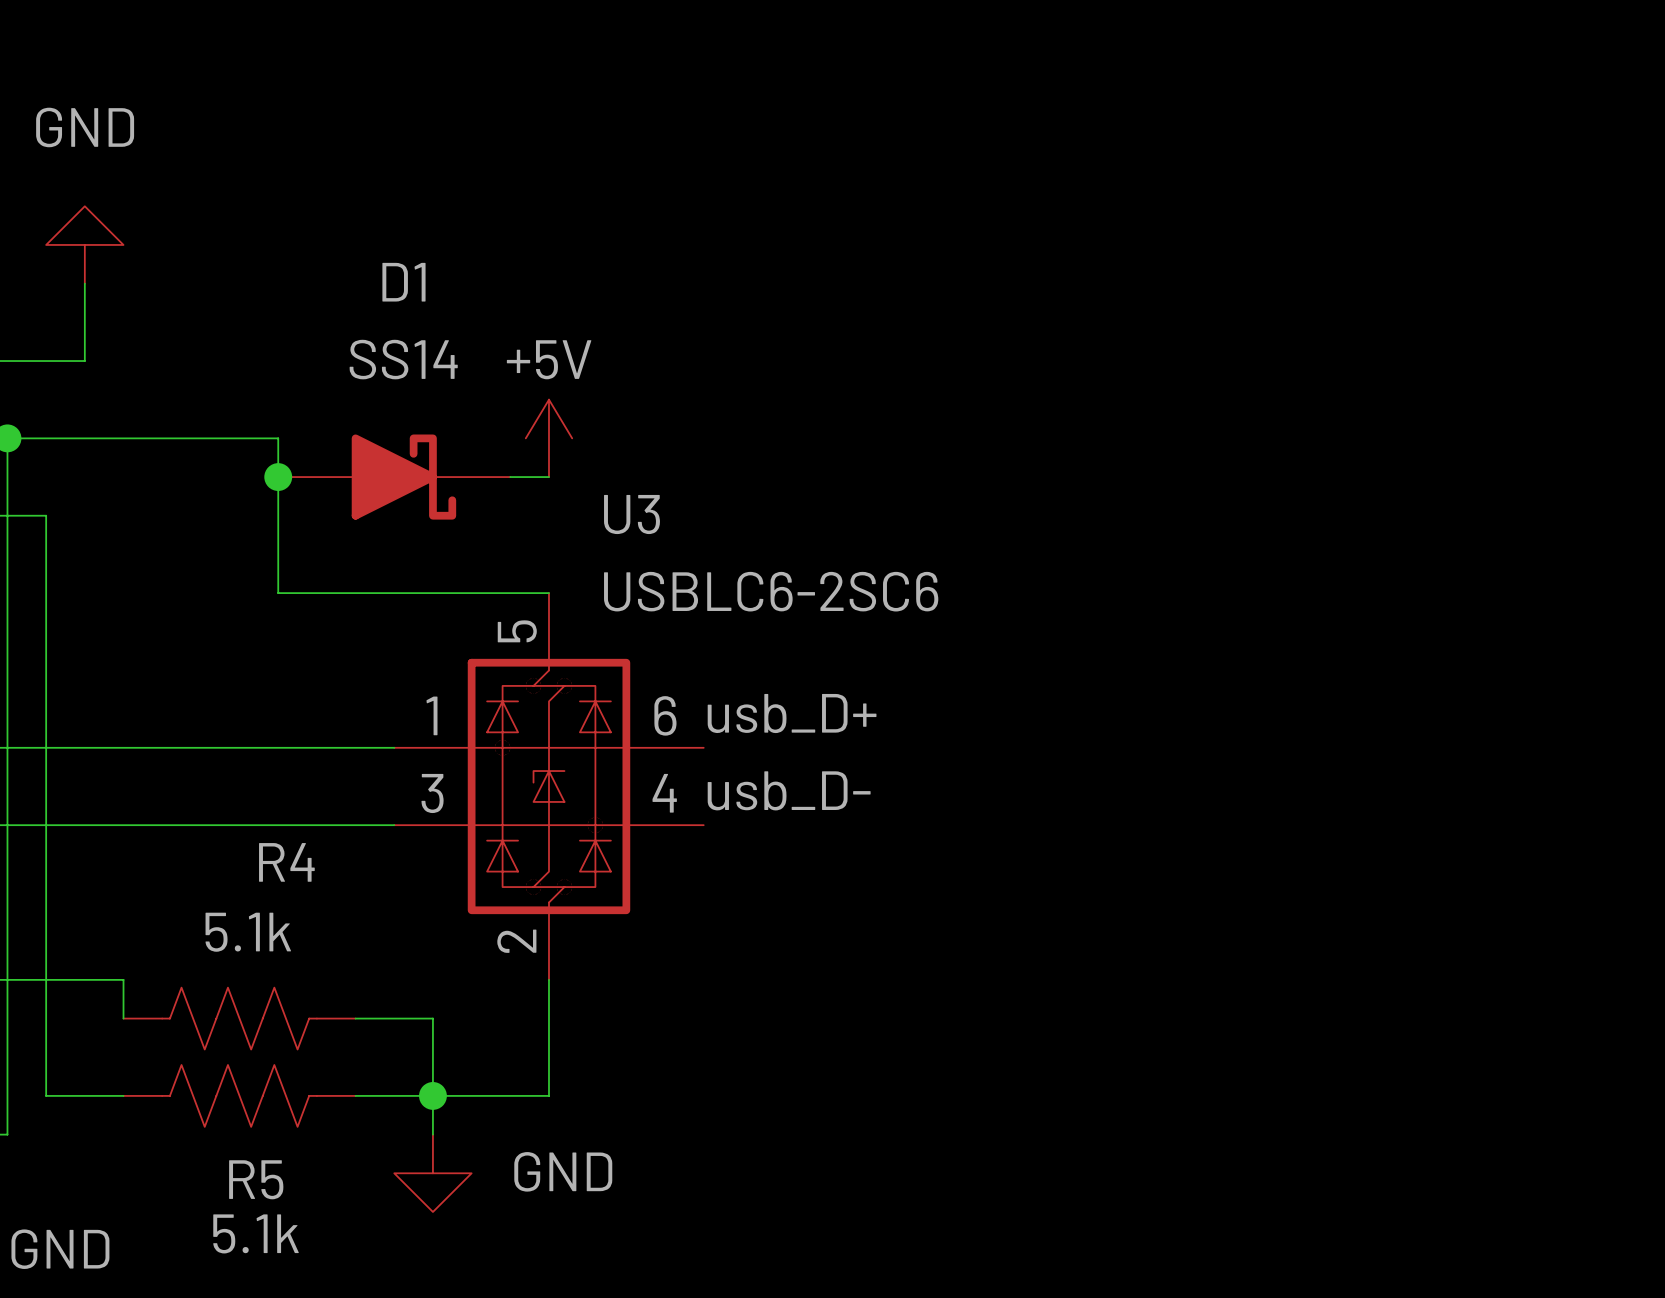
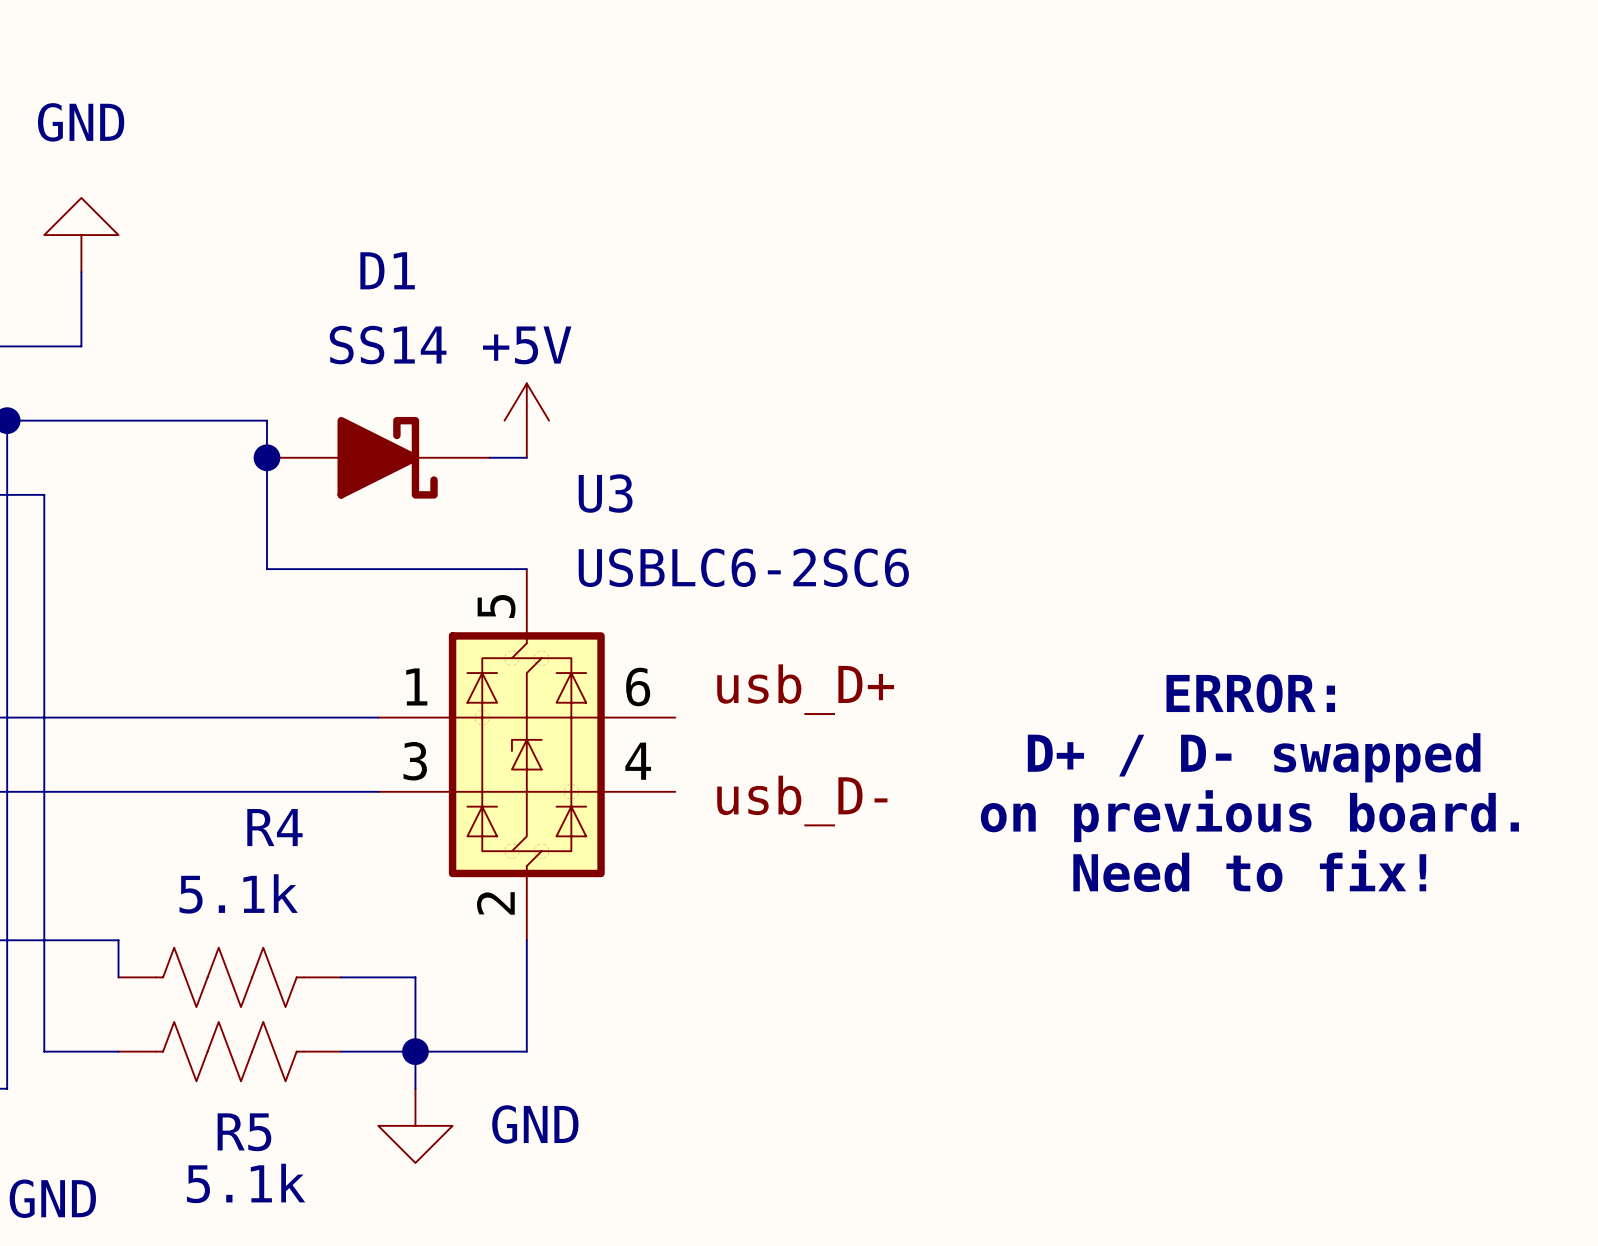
label position: usb_D+ (792, 713) -> usb_D+ (805, 689)
text: none -> ERROR: (1250, 693)
label position: usb_D- (789, 790) -> usb_D- (802, 801)
text: none -> D+ / D- swapped (1254, 757)
text: none -> on previous board. (1249, 816)
text: none -> Need to fix! (1249, 870)

